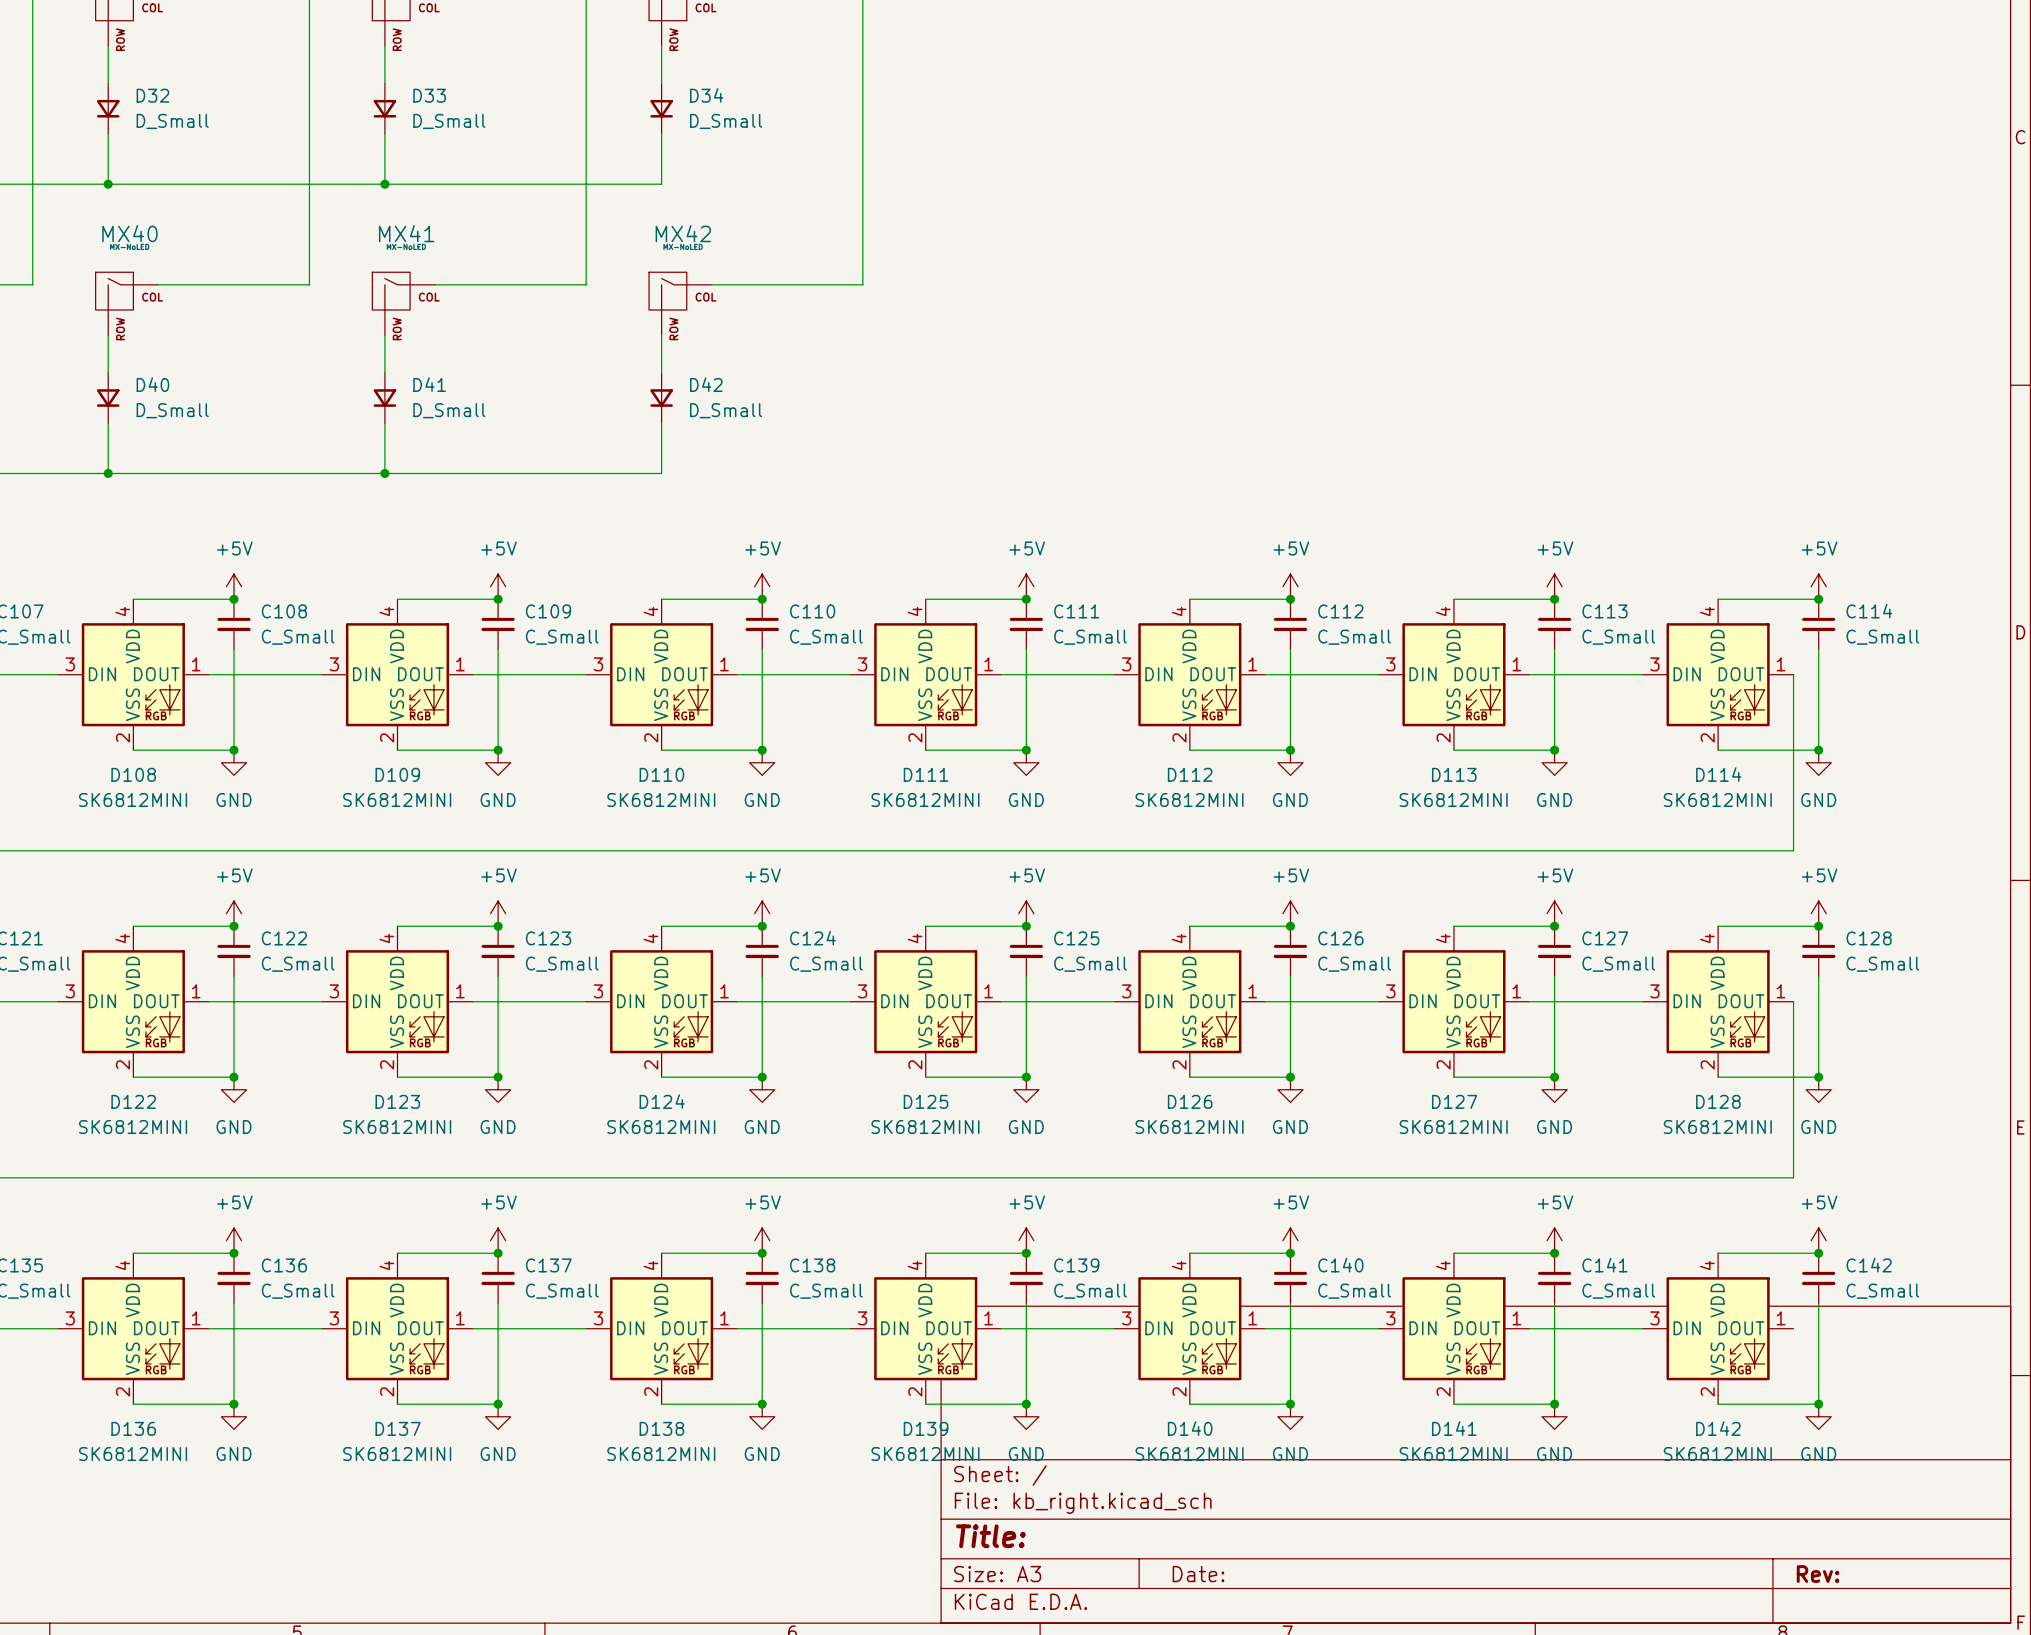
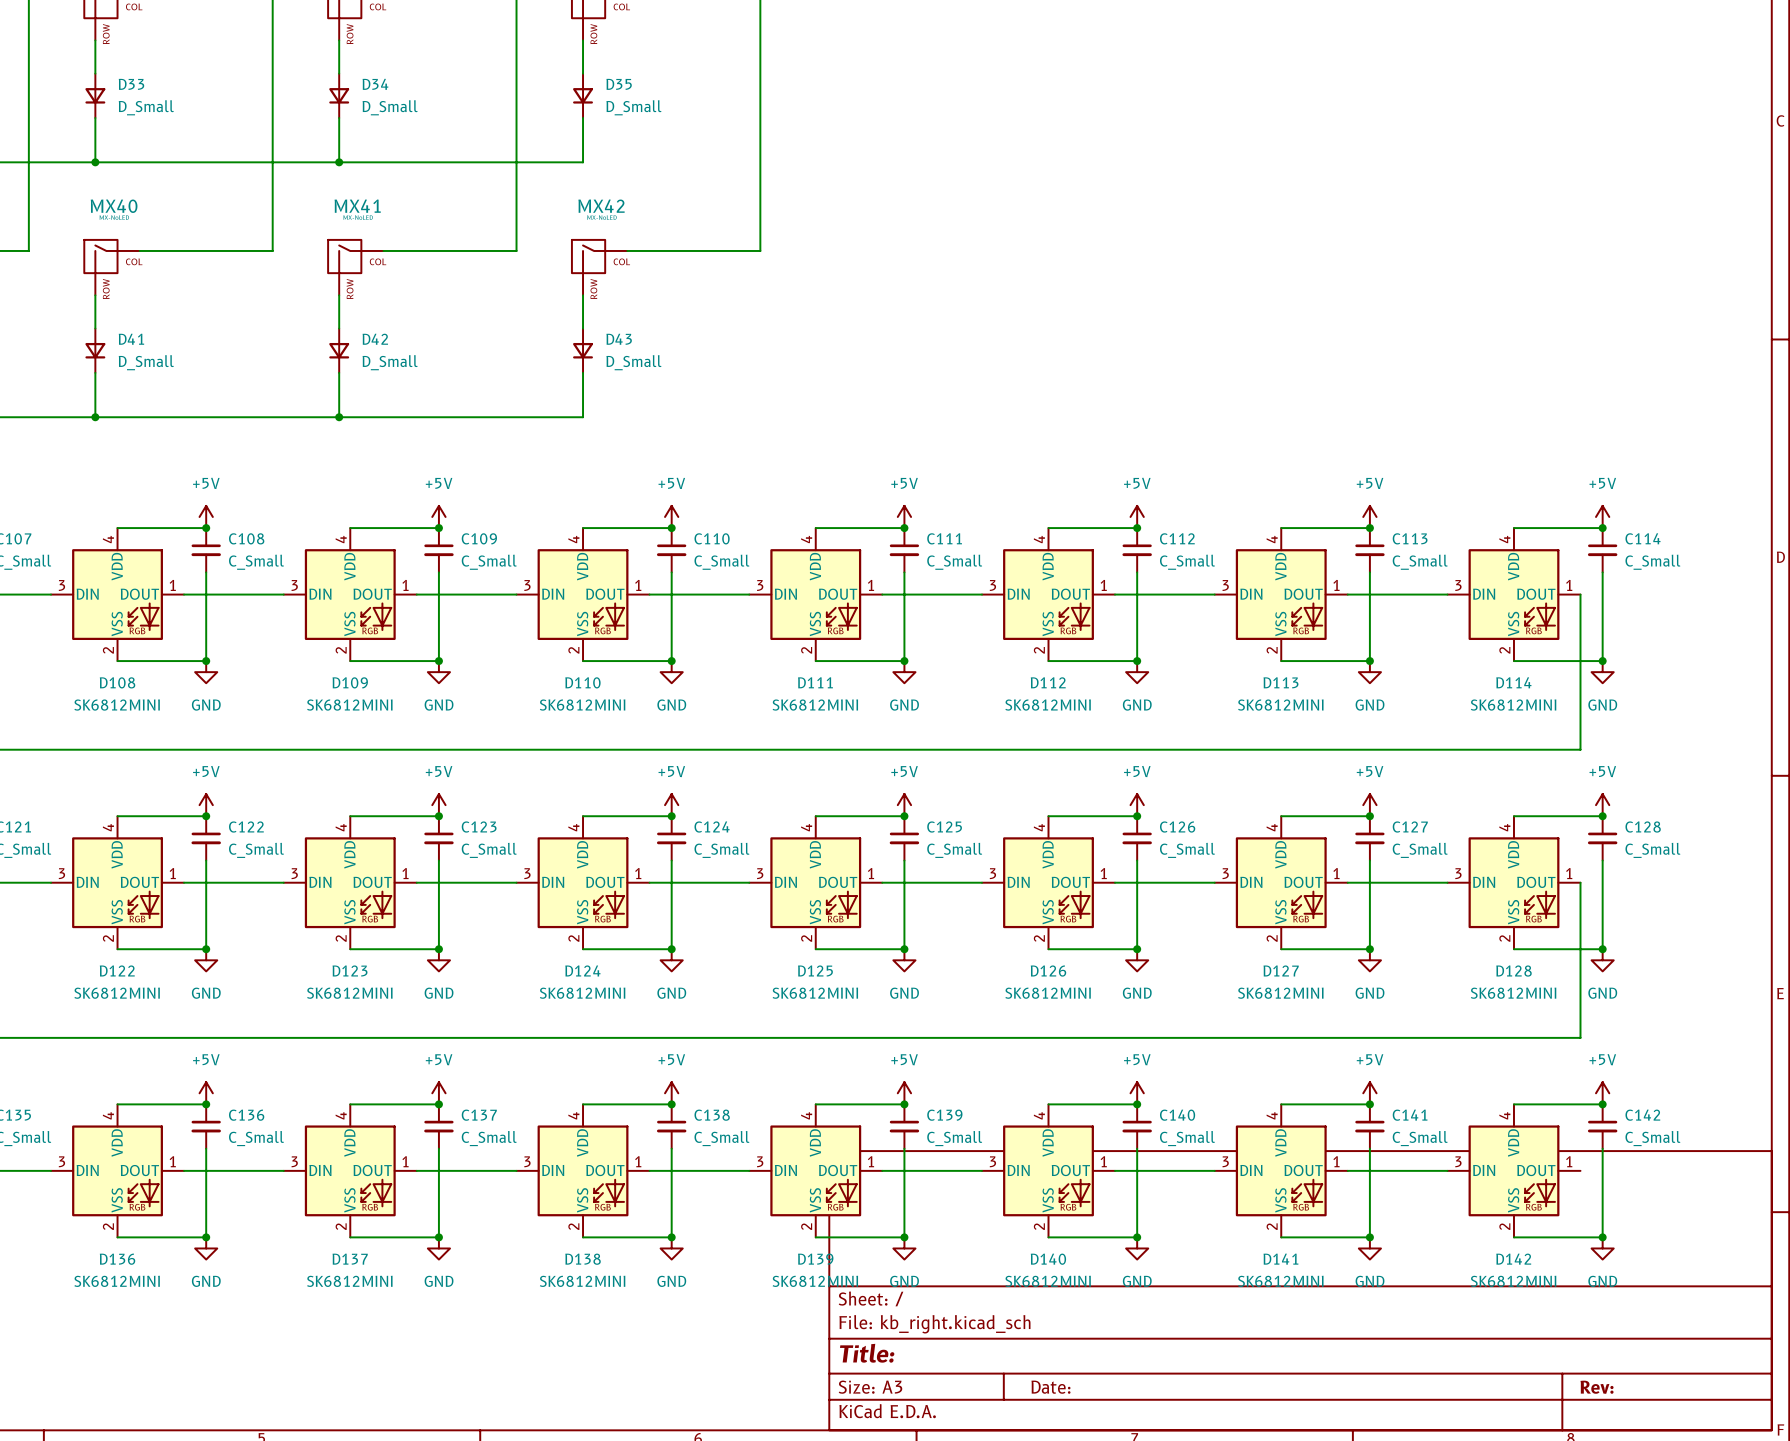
D32 name: D32 (152, 95) -> D33 (131, 84)
D33 name: D33 (429, 95) -> D34 (375, 84)
D34 name: D34 (706, 95) -> D35 (619, 84)
D40 name: D40 (152, 384) -> D41 (131, 339)
D41 name: D41 (429, 384) -> D42 (375, 339)
D42 name: D42 (706, 384) -> D43 (619, 339)

